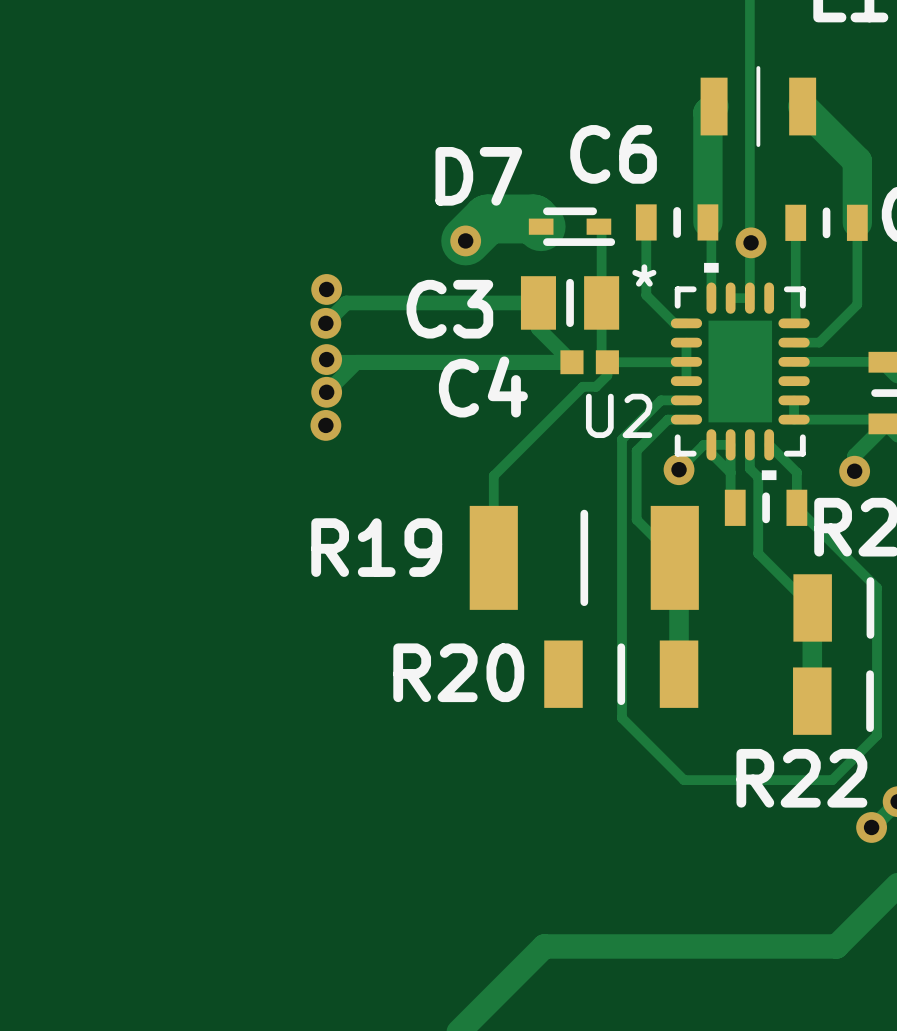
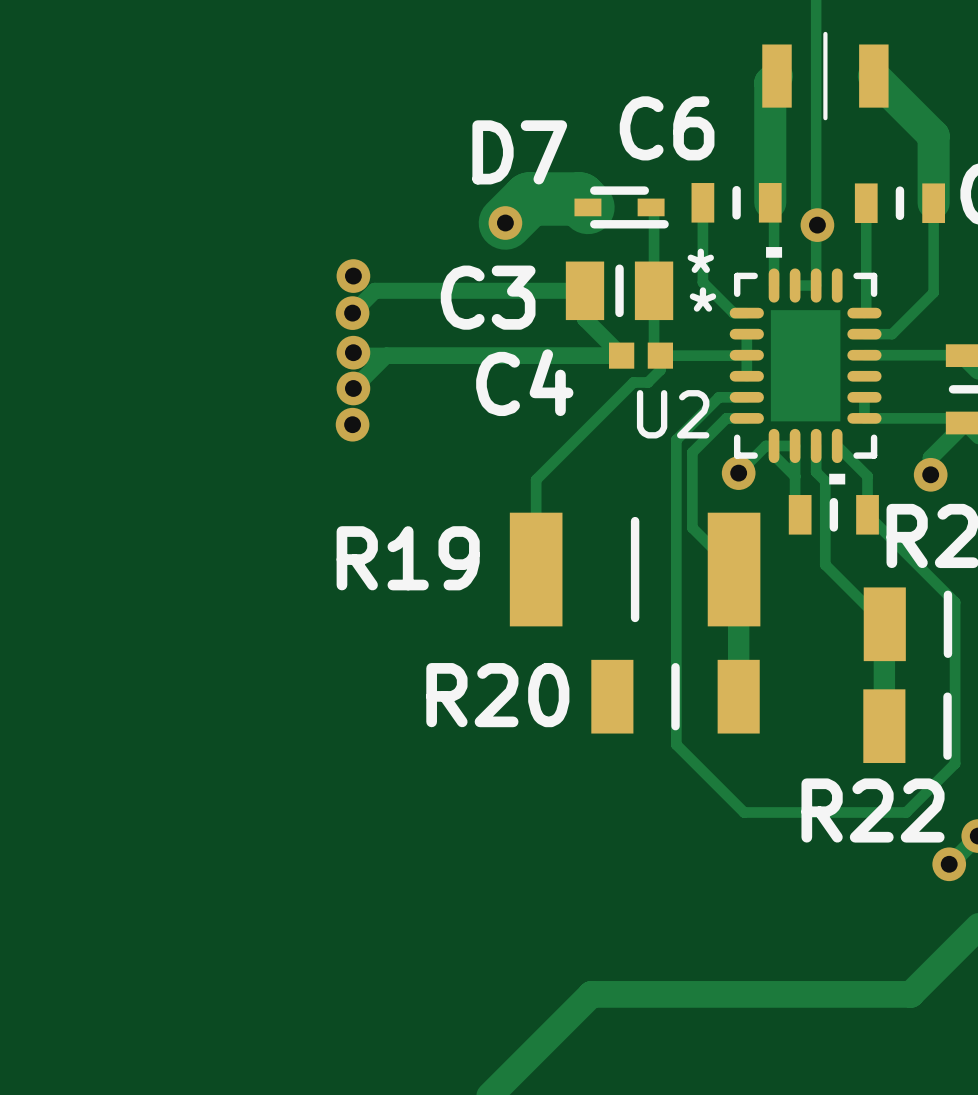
U2 text: none -> * (702, 299)

